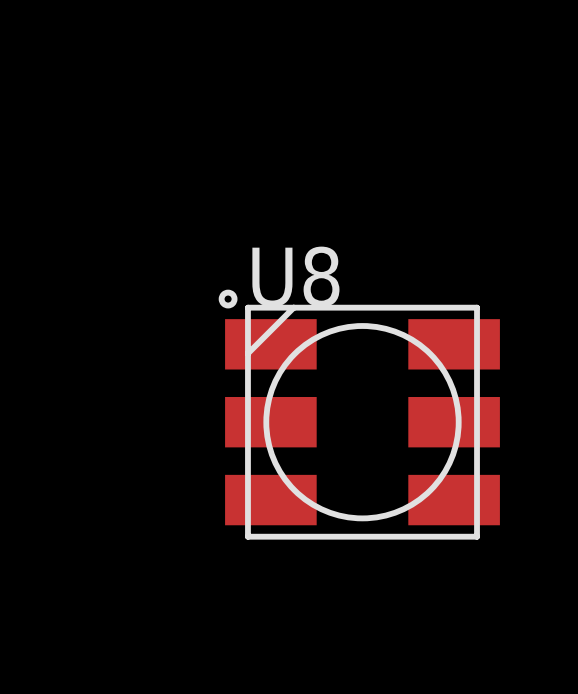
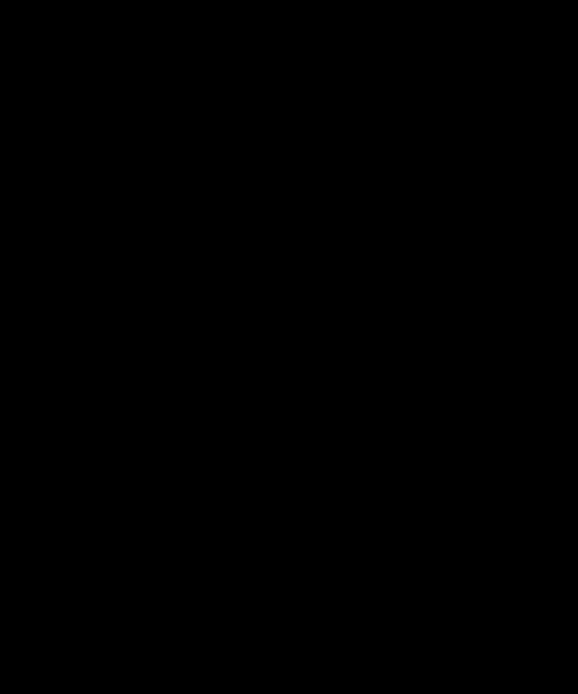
U8: (359, 414) -> none

